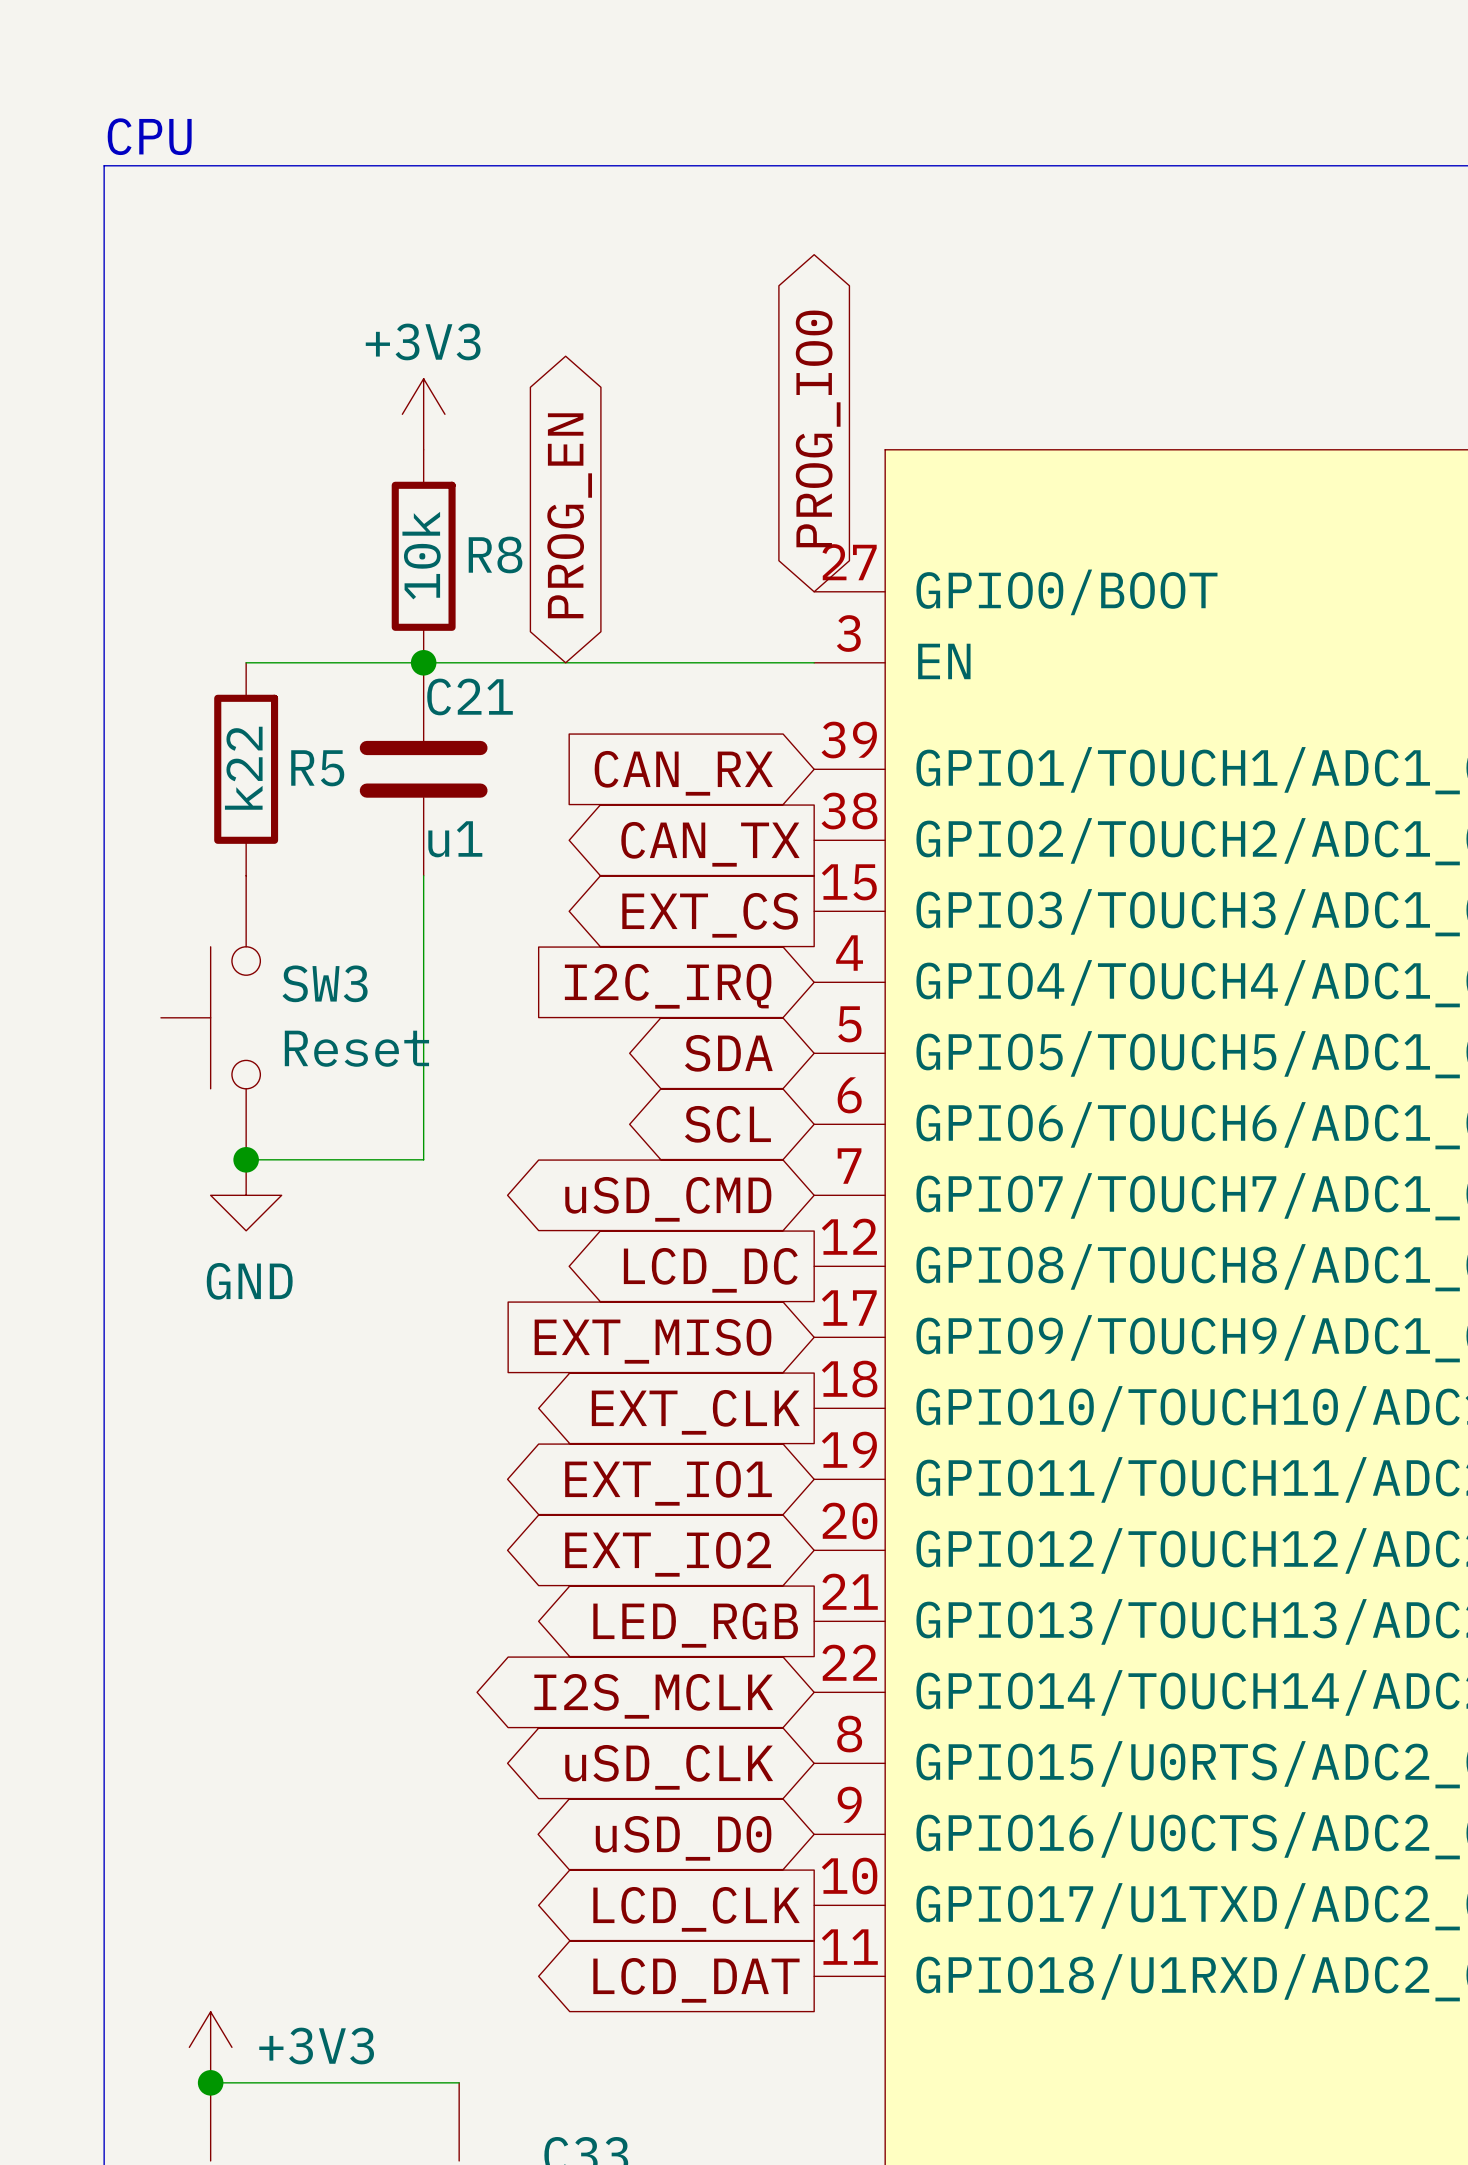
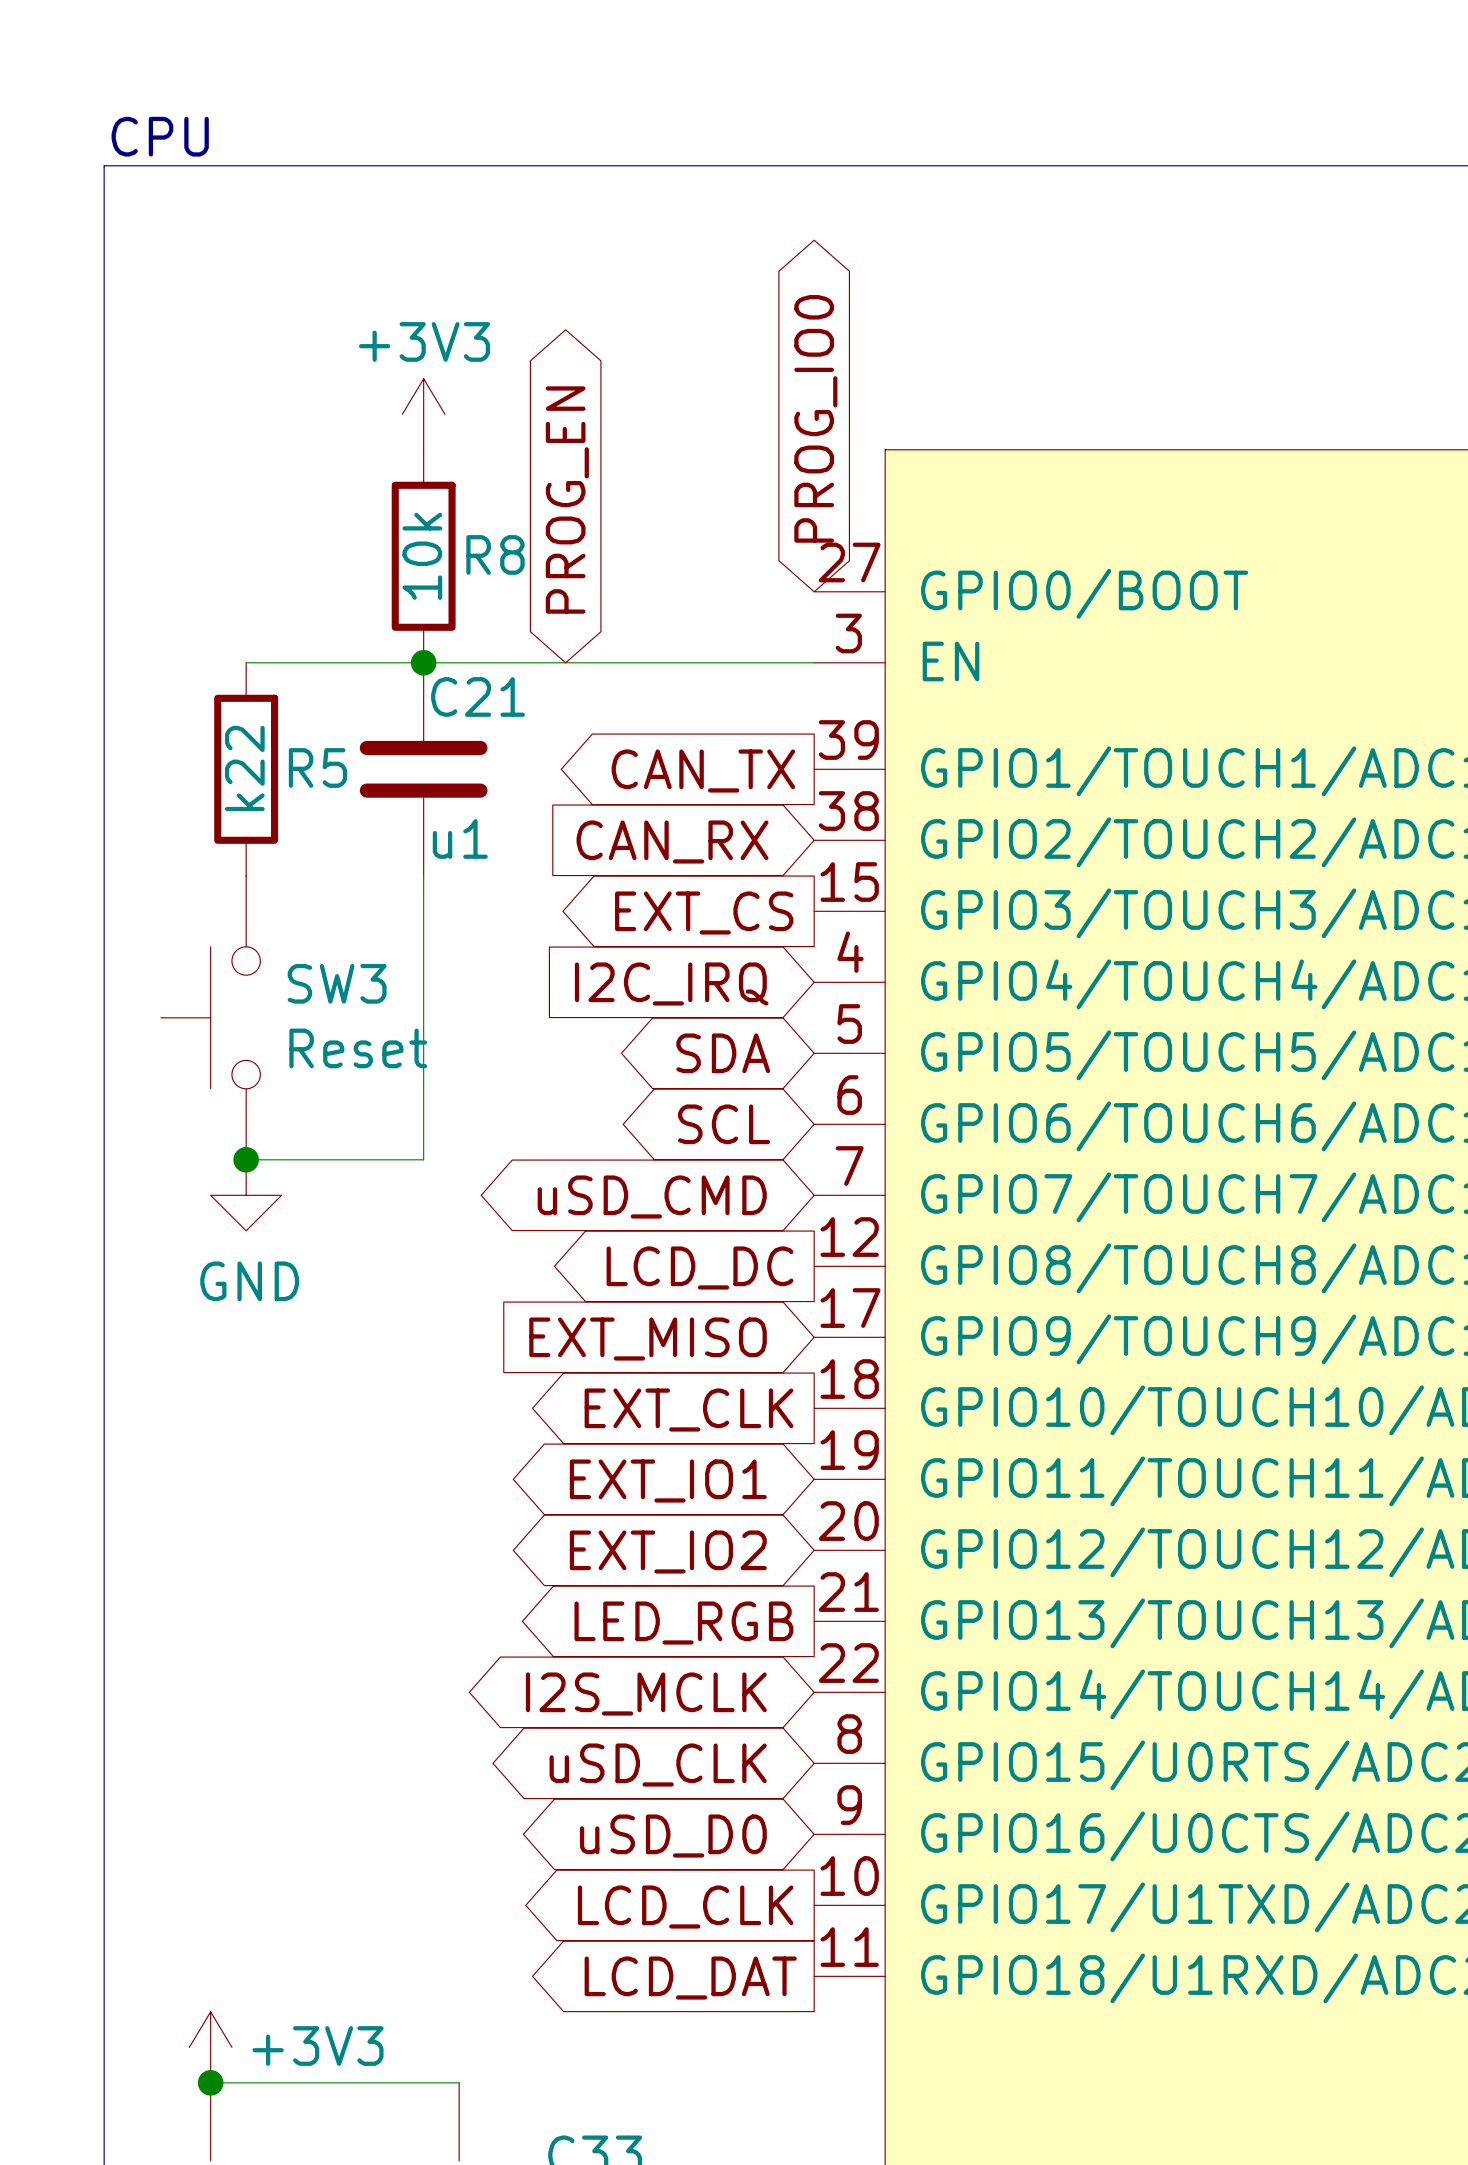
global label shape: input (683, 773) -> output (703, 770)
global label: CAN_RX (683, 773) -> CAN_TX (703, 770)
global label shape: output (710, 844) -> input (672, 841)
global label: CAN_TX (710, 844) -> CAN_RX (672, 841)

